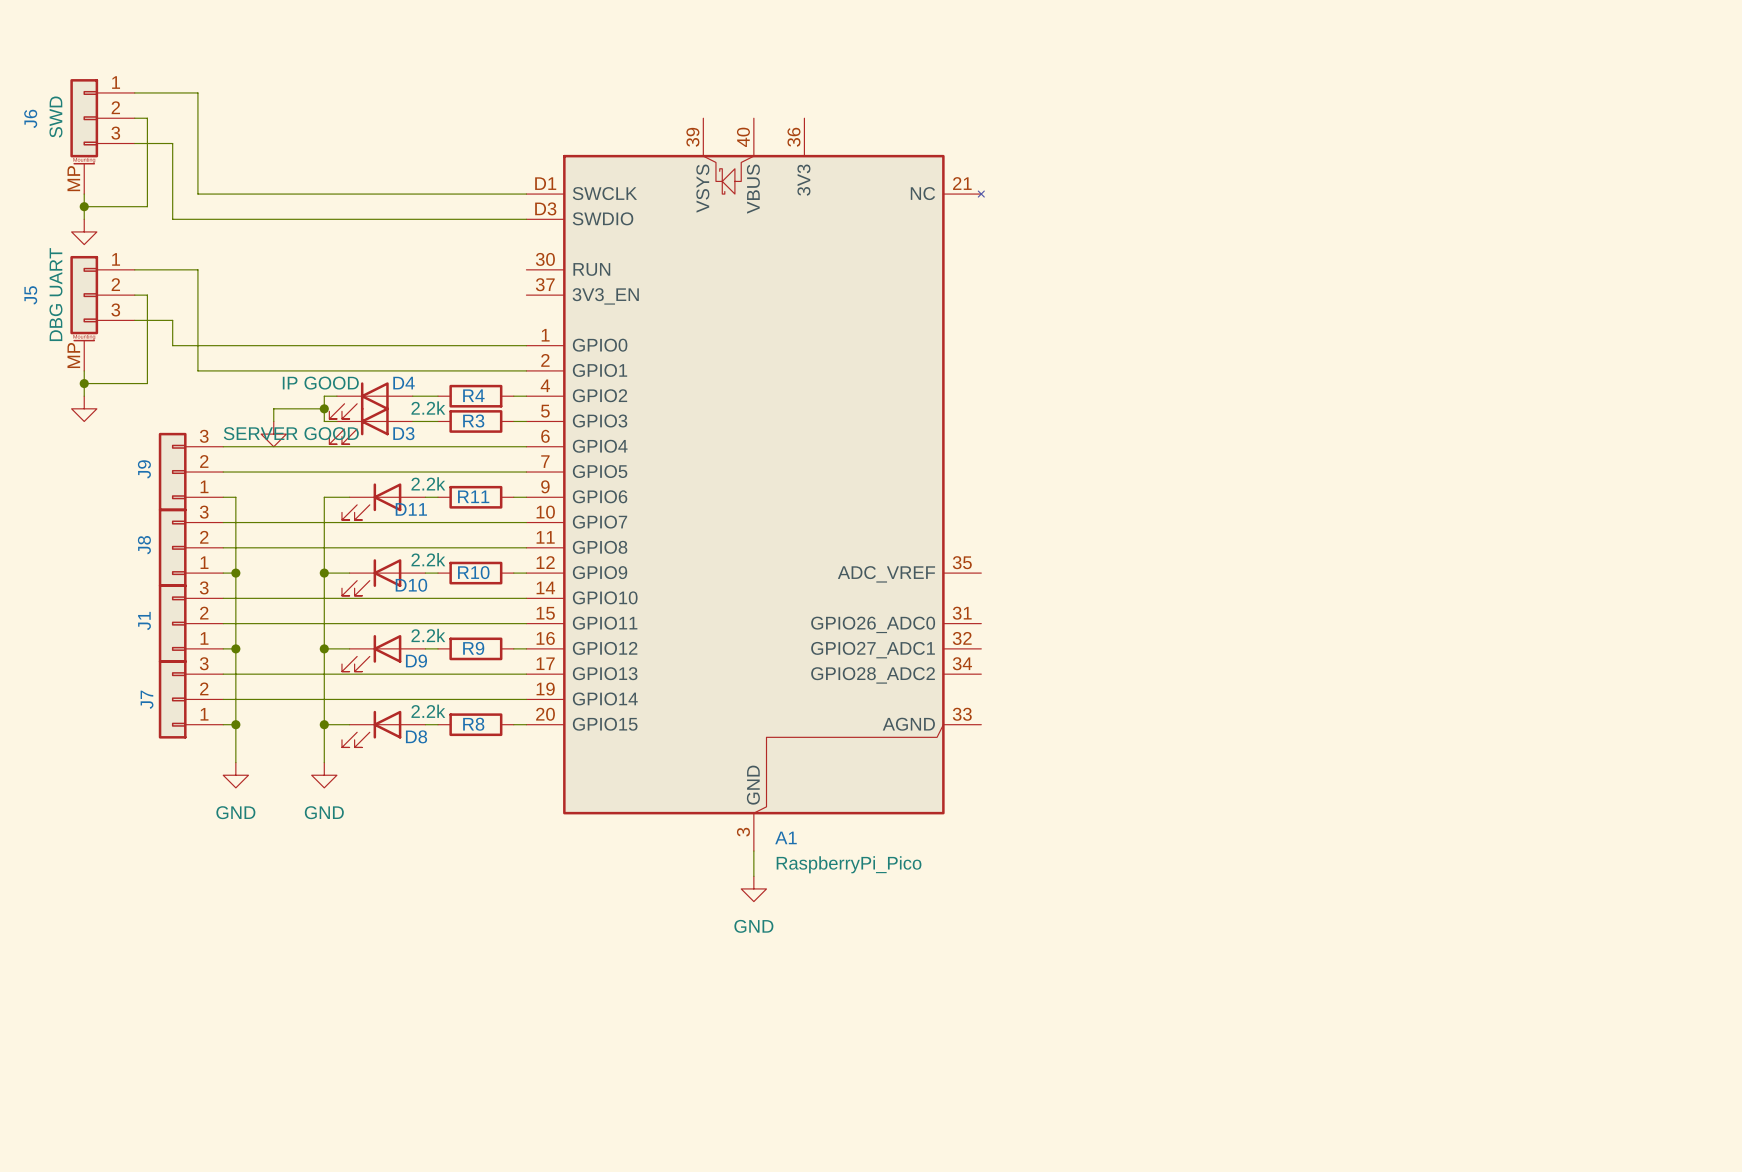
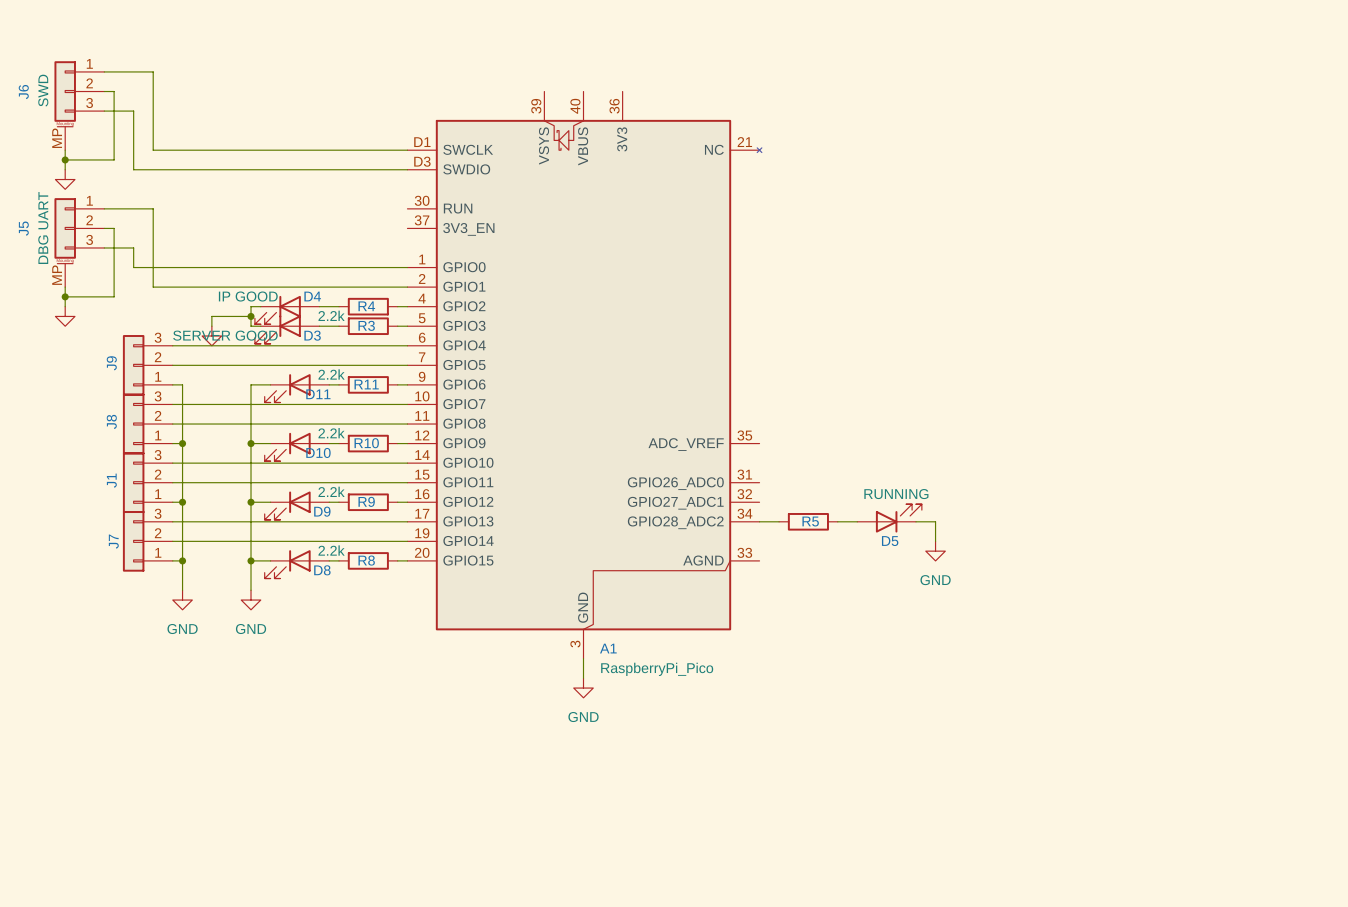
D5: none -> RUNNING (889, 518)
wire: none -> (759, 521) (779, 521)
R5: none -> (808, 521)
wire: none -> (837, 521) (857, 521)
wire: none -> (915, 521) (935, 521) (935, 541)
power symbol: none -> GND (935, 551)

